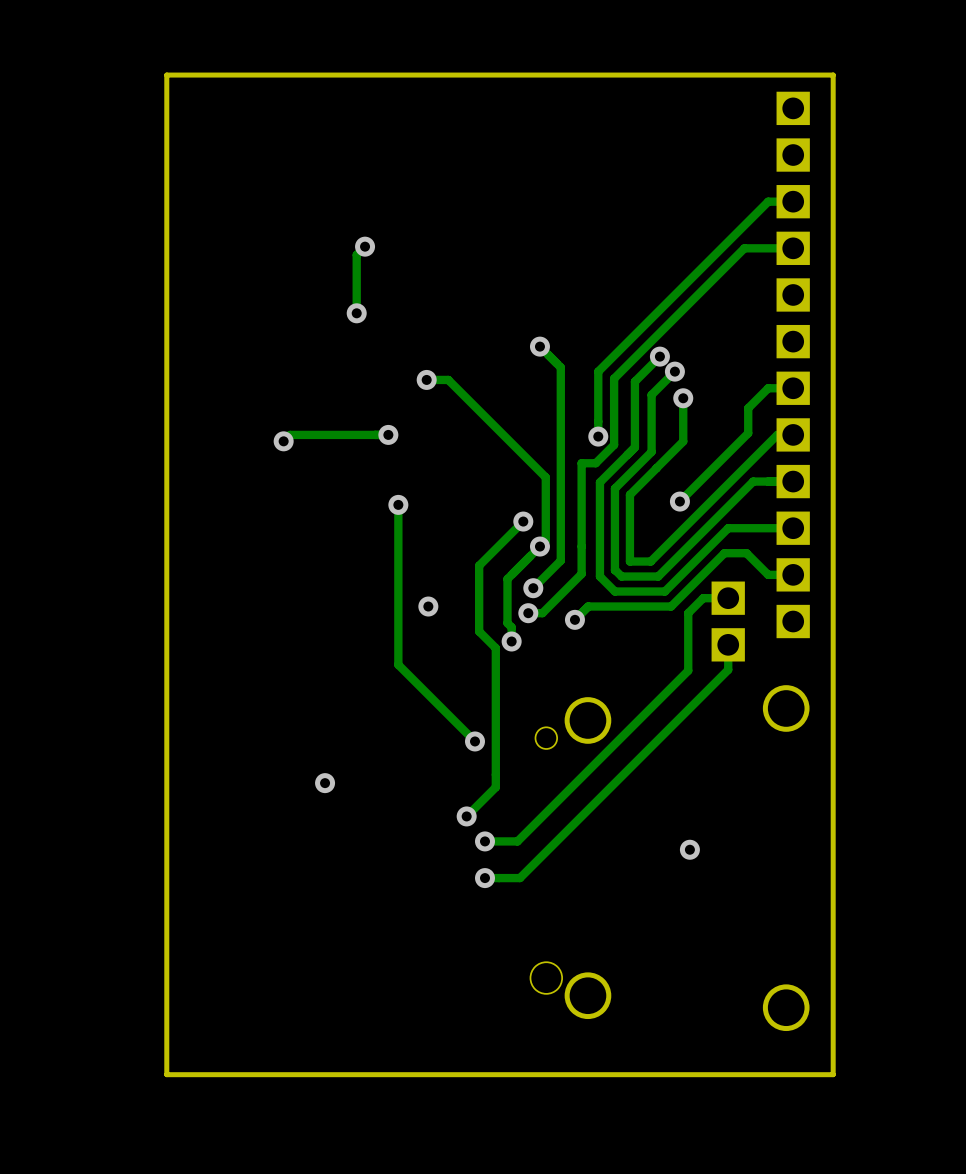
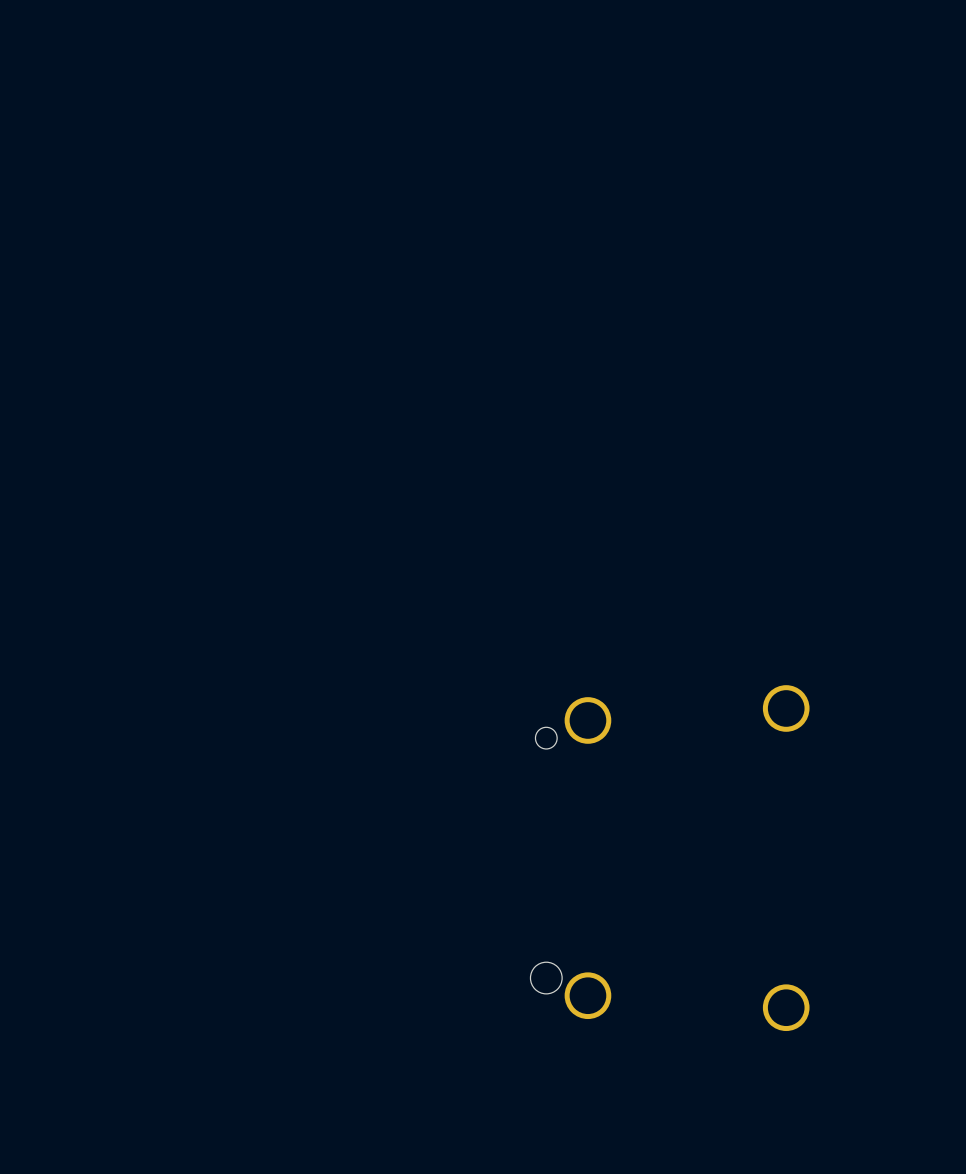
board edge: (833, 75) (166, 75) (166, 1074) (833, 1074) (833, 75) -> none
part: (793, 108) -> none
part: (793, 155) -> none
track: (793, 201) (768, 201) (598, 371) (598, 436) -> none
part: (793, 201) -> none
track: (365, 246) (356, 254) (356, 313) -> none
via: (365, 246) -> none
track: (793, 248) (744, 248) (614, 378) (614, 444) (595, 463) (581, 463) (581, 574) (542, 613) (528, 613) -> none
part: (793, 248) -> none
part: (793, 294) -> none
via: (356, 313) -> none
part: (793, 341) -> none
track: (539, 346) (560, 367) (560, 560) (533, 588) -> none
via: (539, 346) -> none
track: (659, 356) (634, 381) (634, 447) (599, 482) (599, 576) (614, 591) (664, 591) (728, 528) (793, 528) -> none
via: (659, 356) -> none
track: (674, 371) (651, 394) (651, 451) (614, 488) (614, 570) -> none
via: (674, 371) -> none
track: (426, 379) (448, 379) (545, 477) (545, 540) (507, 579) (507, 623) (511, 627) (511, 641) -> none
via: (426, 379) -> none
track: (793, 388) (768, 388) (748, 408) (748, 433) (679, 501) -> none
part: (793, 388) -> none
track: (683, 398) (683, 441) (629, 494) (629, 561) (650, 561) (777, 434) (793, 434) -> none
via: (683, 398) -> none
track: (388, 434) (290, 434) (283, 441) -> none
via: (388, 434) -> none
part: (793, 434) -> none
via: (598, 436) -> none
via: (283, 441) -> none
track: (793, 481) (753, 481) (658, 576) (621, 576) (615, 570) -> none
part: (793, 481) -> none
via: (679, 501) -> none
track: (398, 504) (398, 664) (475, 741) -> none
via: (398, 504) -> none
track: (523, 521) (479, 565) (479, 631) (495, 648) (495, 787) (466, 816) -> none
via: (523, 521) -> none
part: (793, 528) -> none
via: (539, 546) -> none
track: (793, 574) (768, 574) (746, 553) (724, 553) (671, 606) (588, 606) (574, 619) -> none
part: (793, 574) -> none
via: (533, 588) -> none
track: (728, 598) (703, 598) (688, 613) (688, 670) (517, 841) (484, 841) -> none
part: (728, 598) -> none
via: (428, 606) -> none
via: (528, 613) -> none
via: (574, 619) -> none
part: (793, 621) -> none
via: (511, 641) -> none
track: (728, 644) (728, 669) (519, 878) (484, 878) -> none
part: (728, 644) -> none
via: (475, 741) -> none
via: (325, 783) -> none
via: (466, 816) -> none
via: (484, 841) -> none
via: (689, 849) -> none
via: (484, 878) -> none

